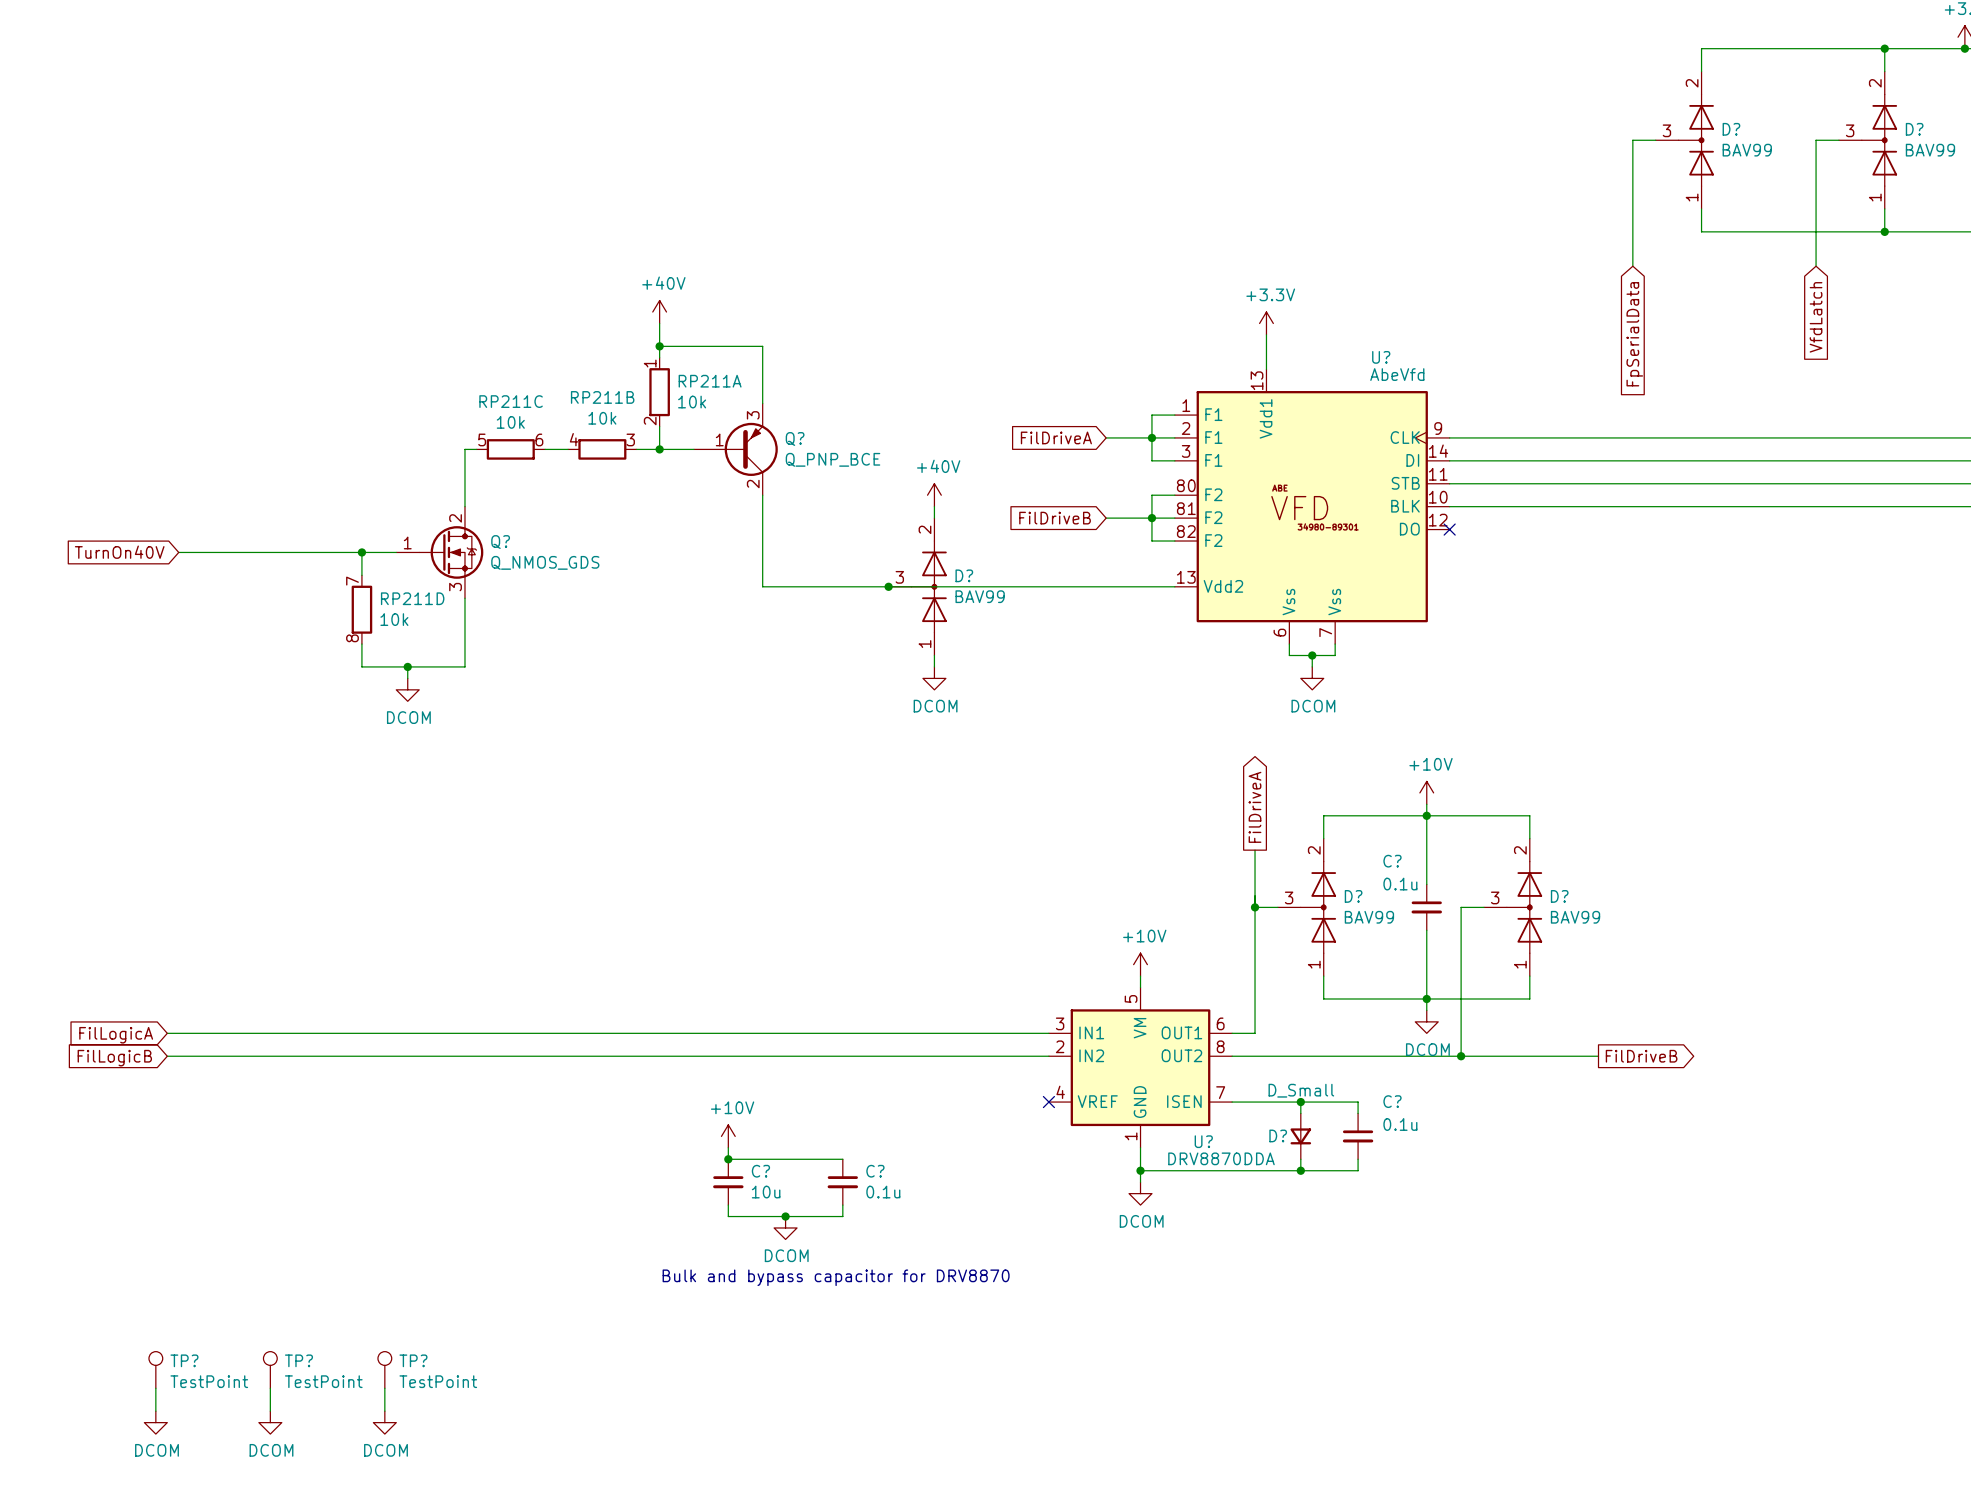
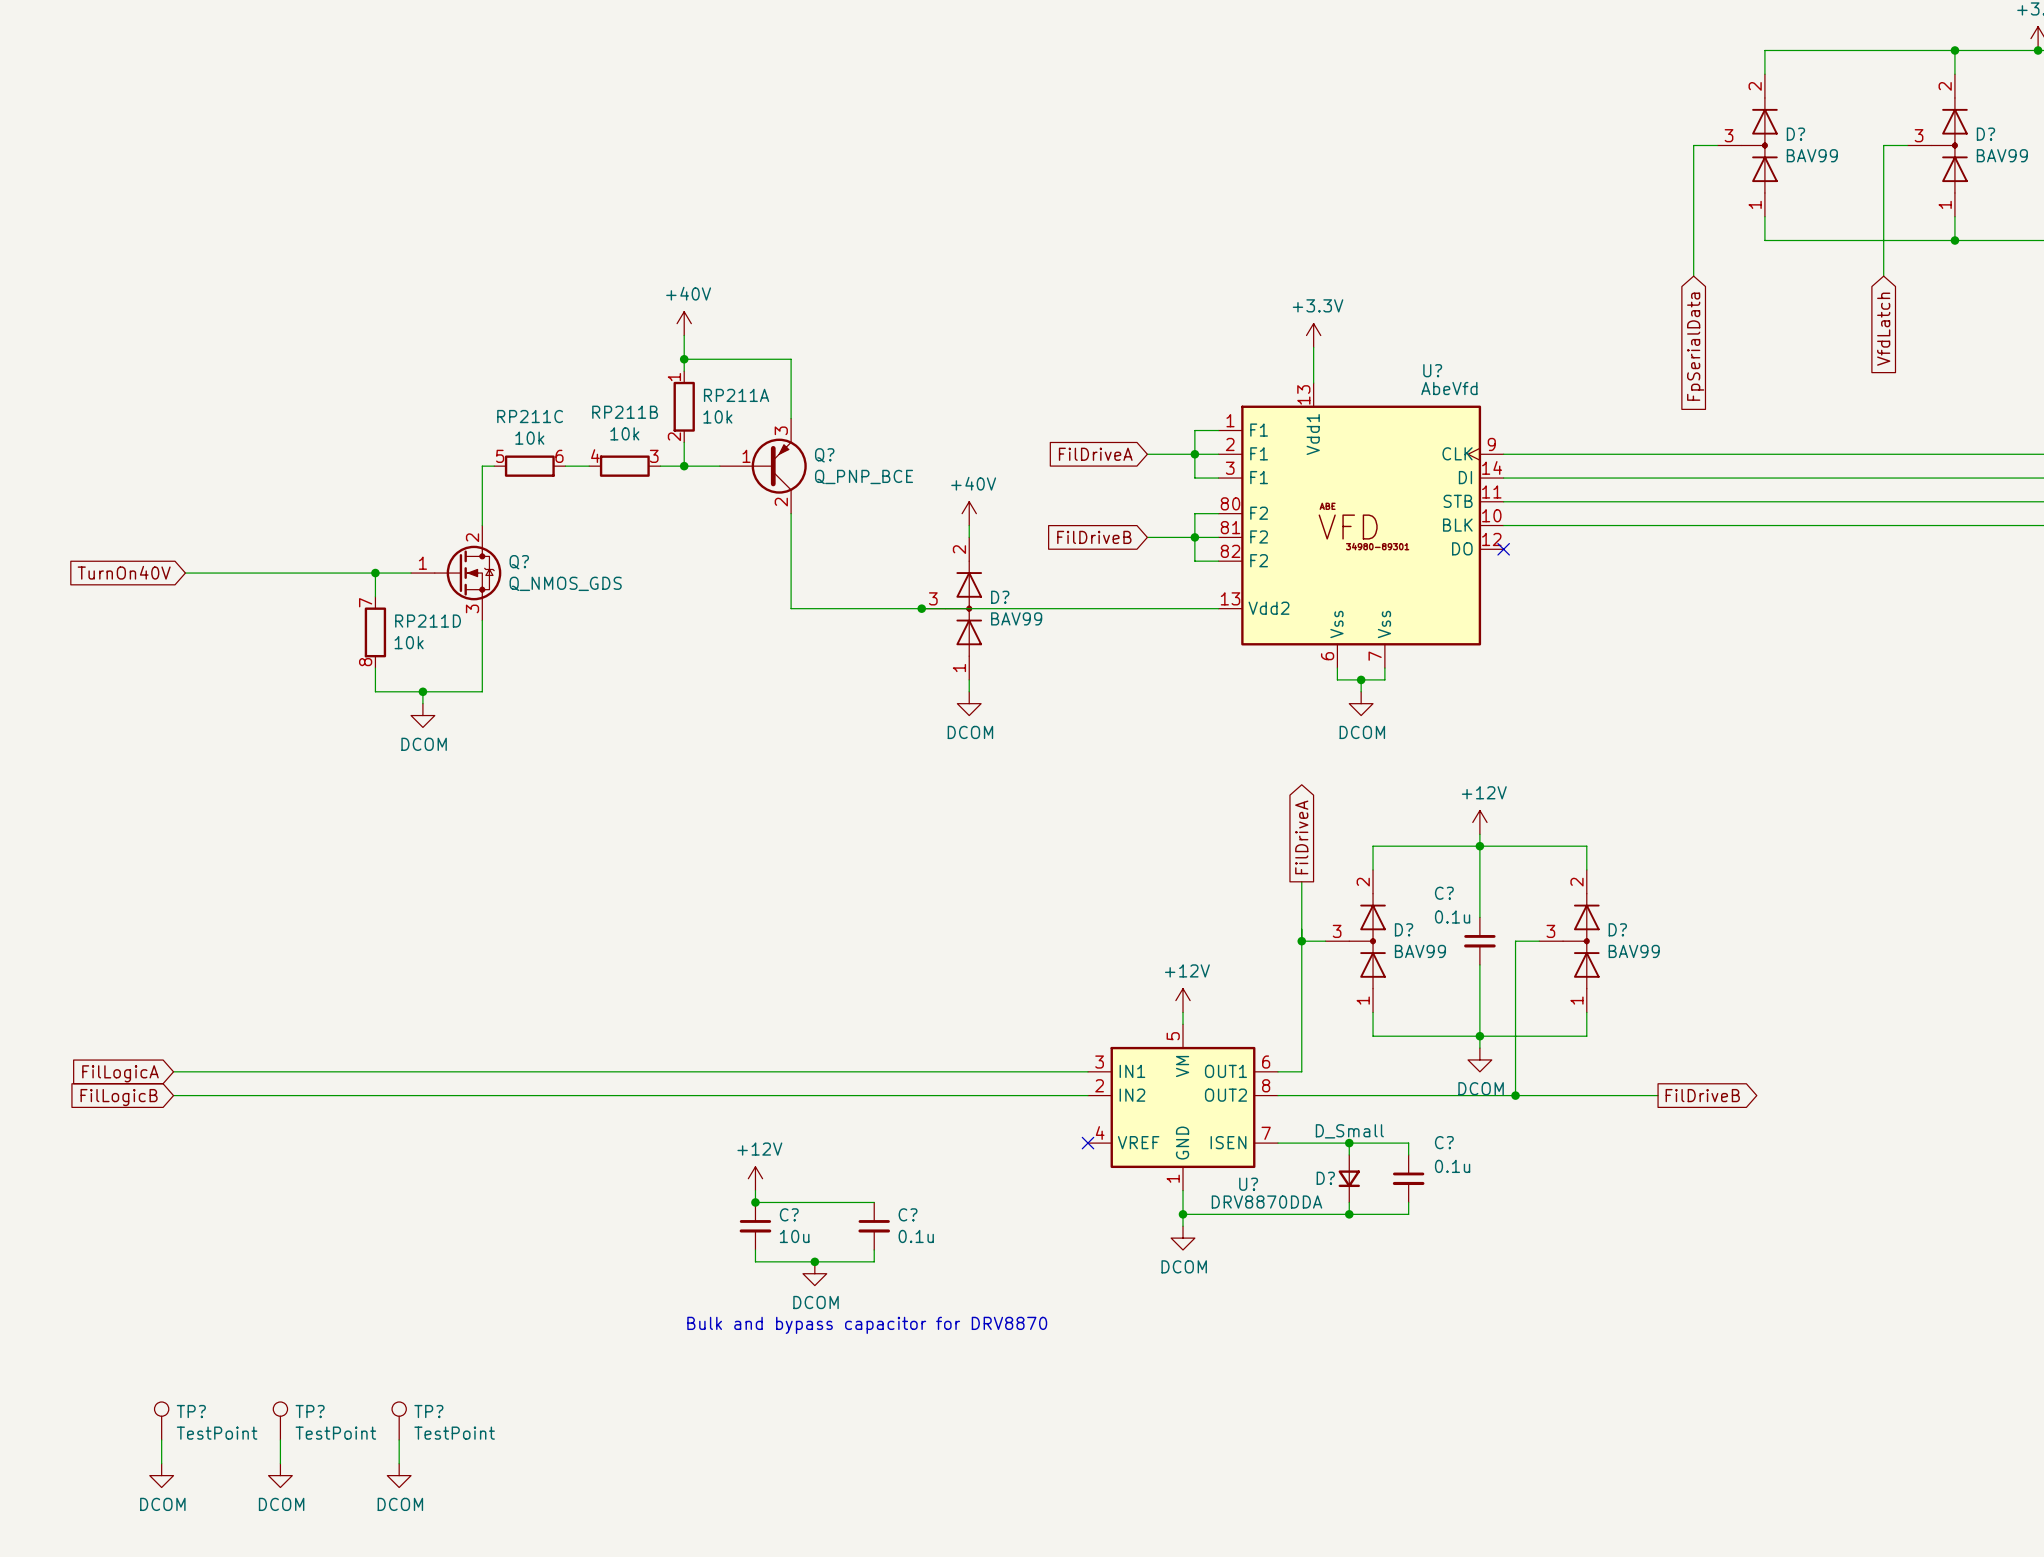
power symbol: +10V (1426, 792) -> +12V (1479, 822)
power symbol: +10V (1140, 964) -> +12V (1183, 1000)
power symbol: +10V (728, 1136) -> +12V (755, 1178)

